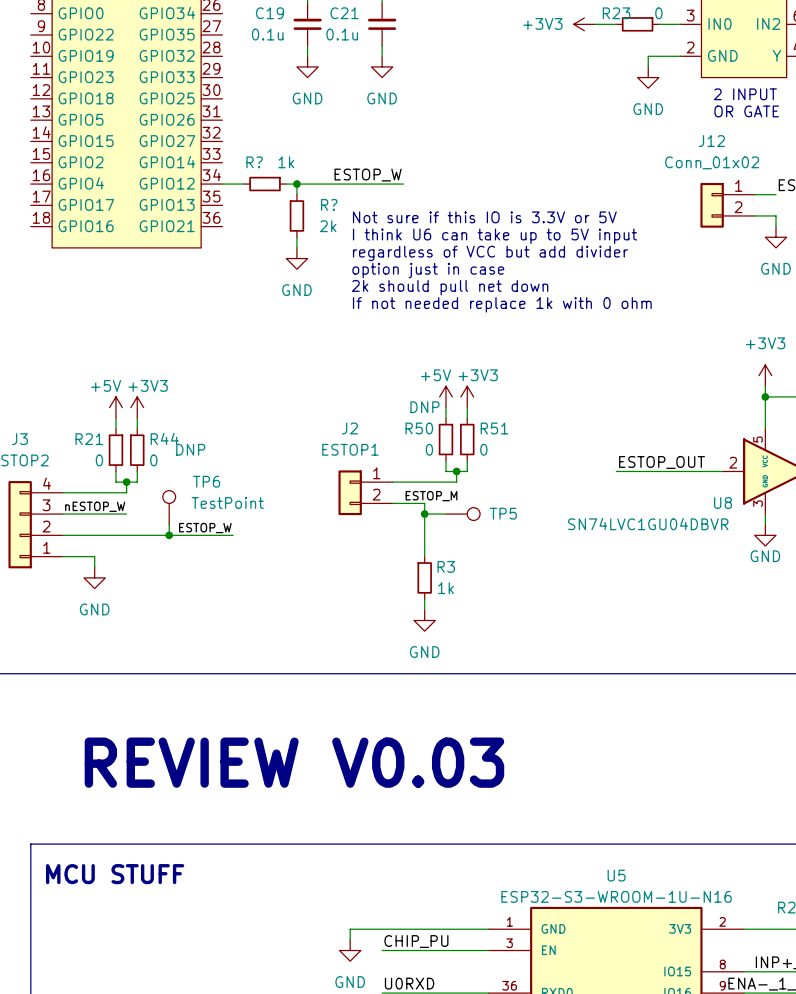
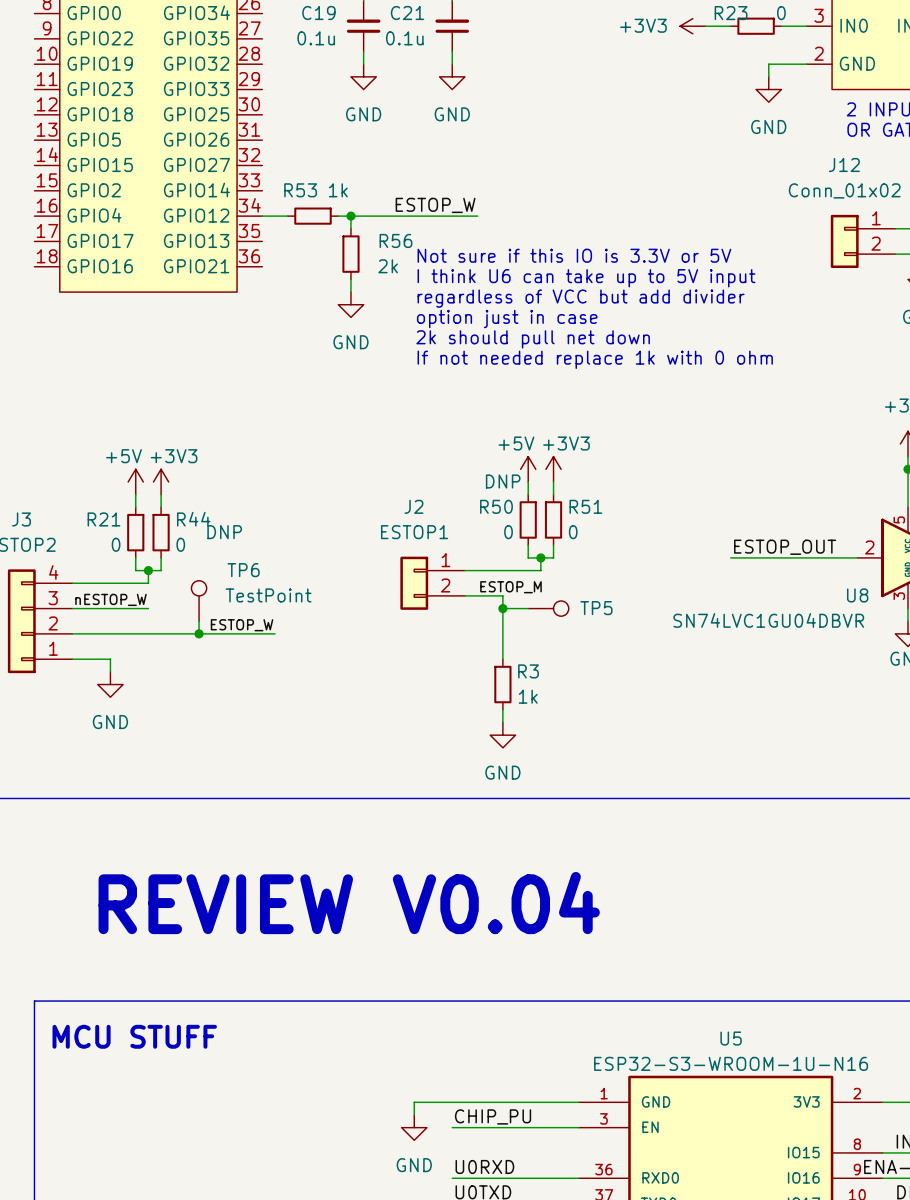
R? name: R? (254, 162) -> R53 (300, 190)
R? name: R? (329, 204) -> R56 (395, 240)
text: REVIEW V0.03 (294, 762) -> REVIEW V0.04 (349, 903)

